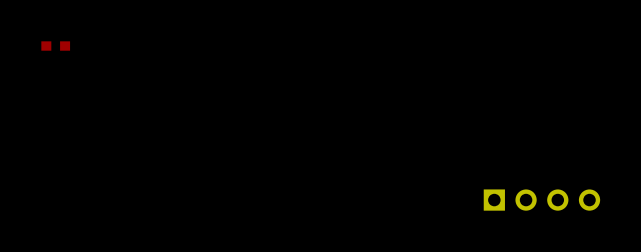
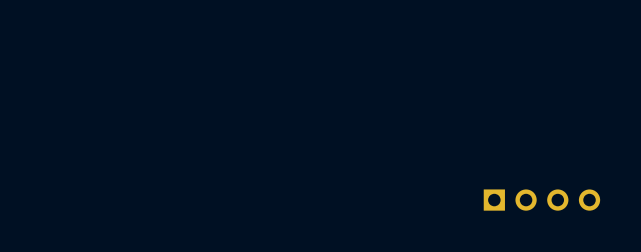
part: (55, 46) -> none

